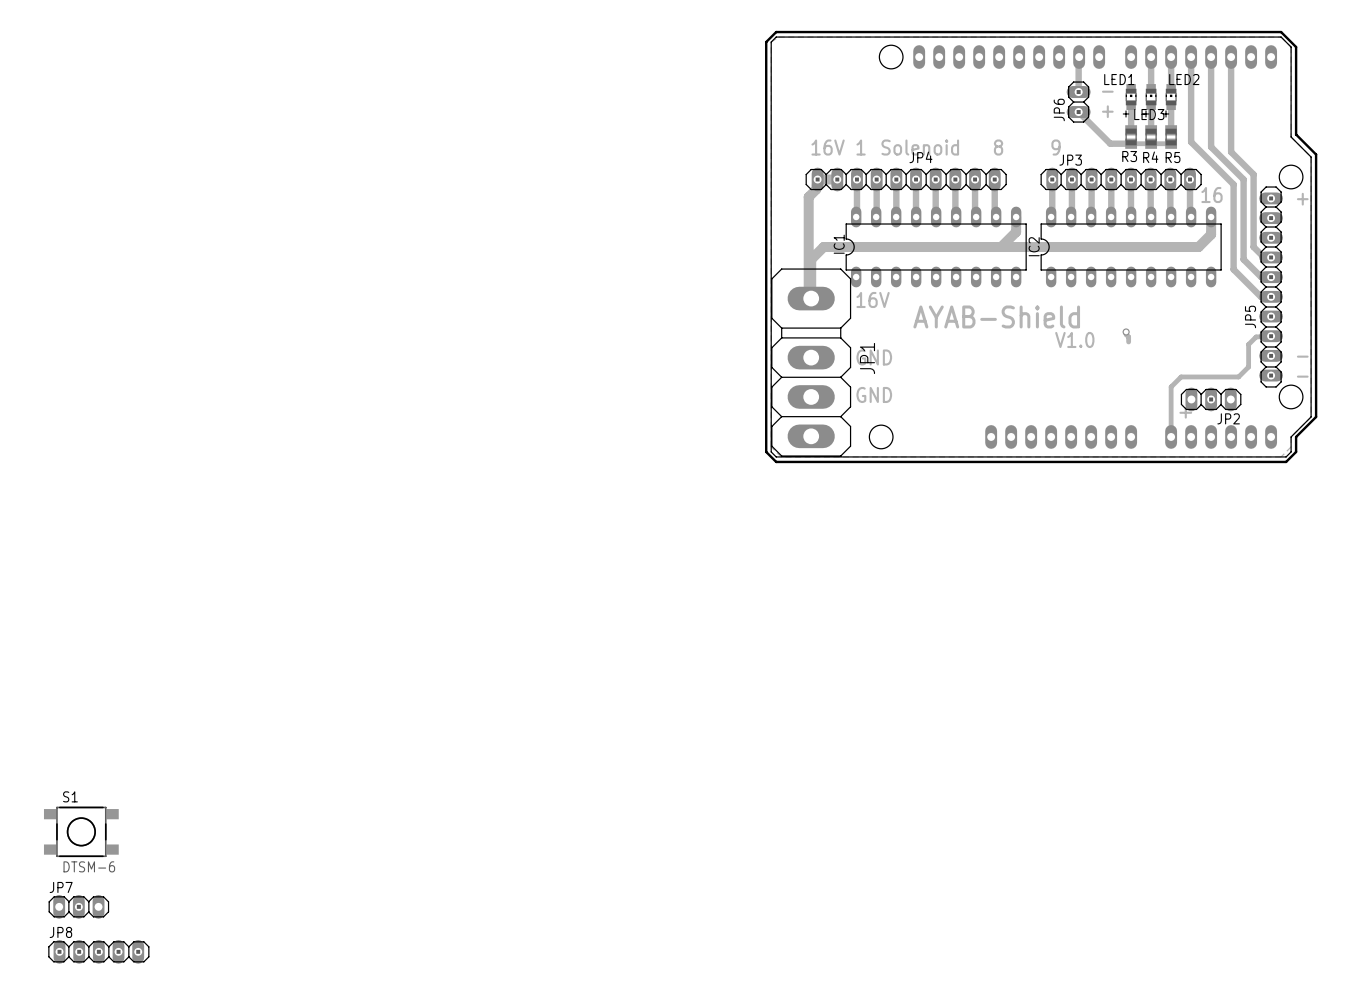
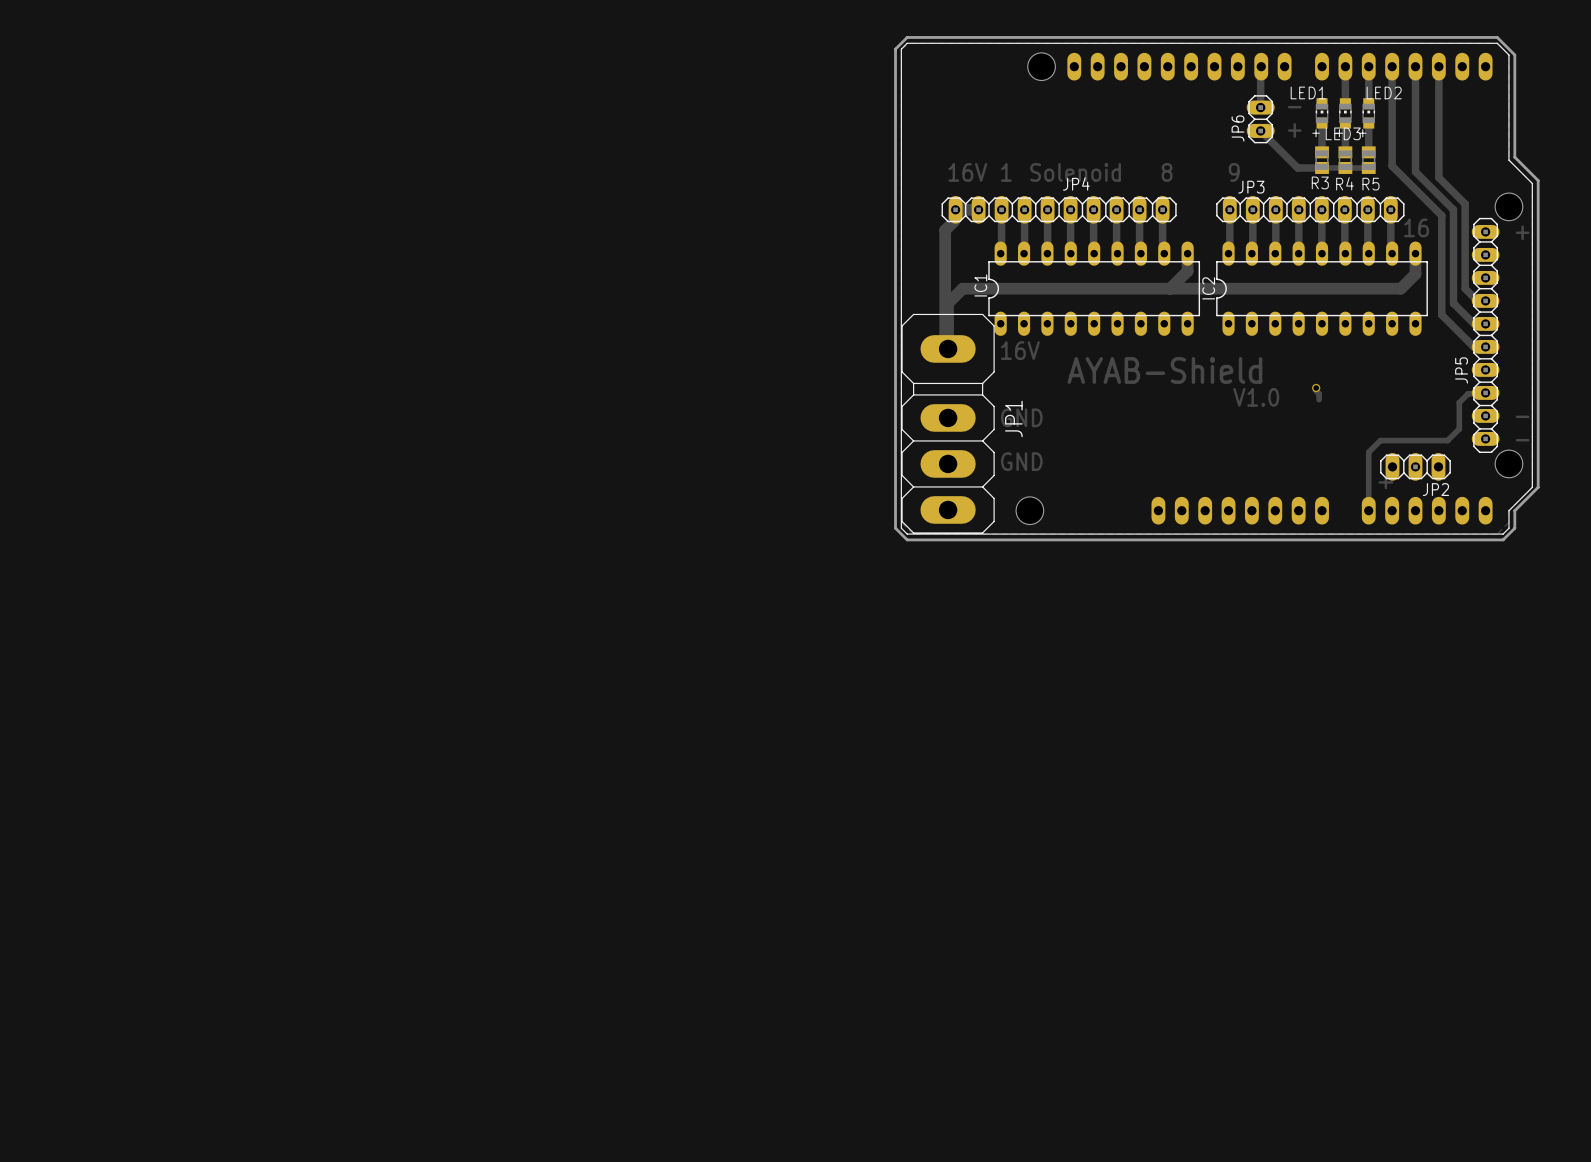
S1: DTSM-6 (81, 831) -> none
JP7: (78, 906) -> none
JP8: (98, 951) -> none

